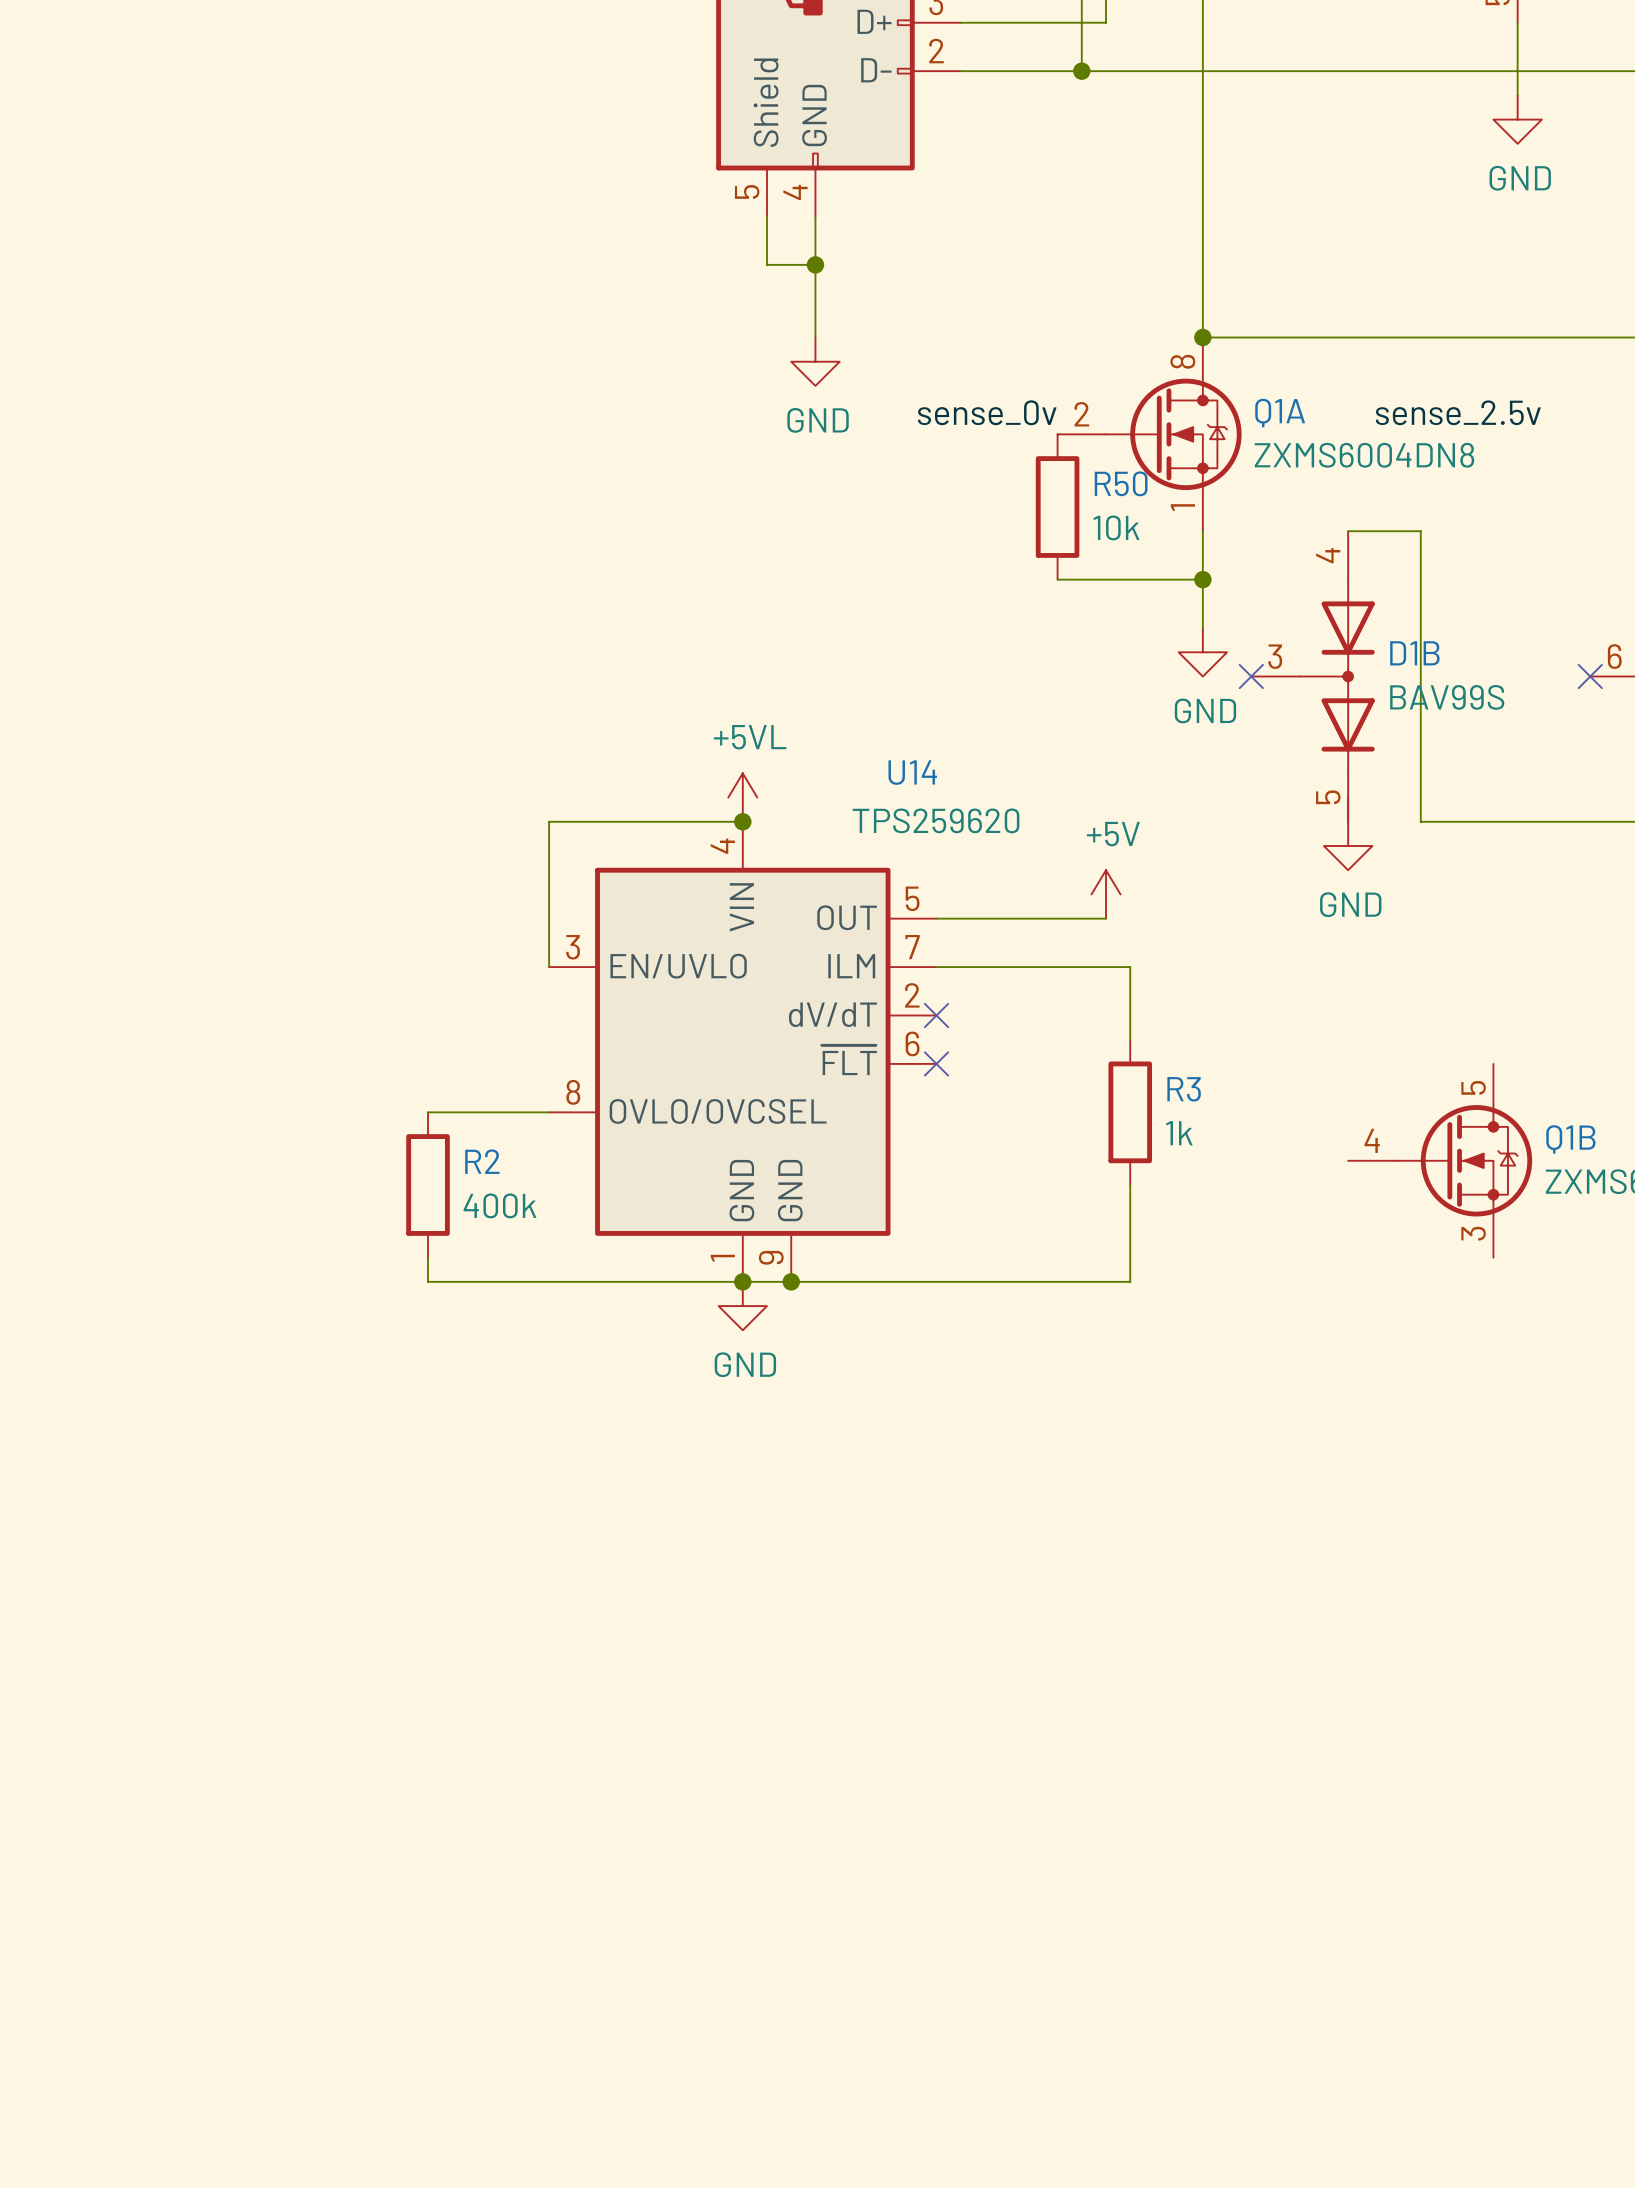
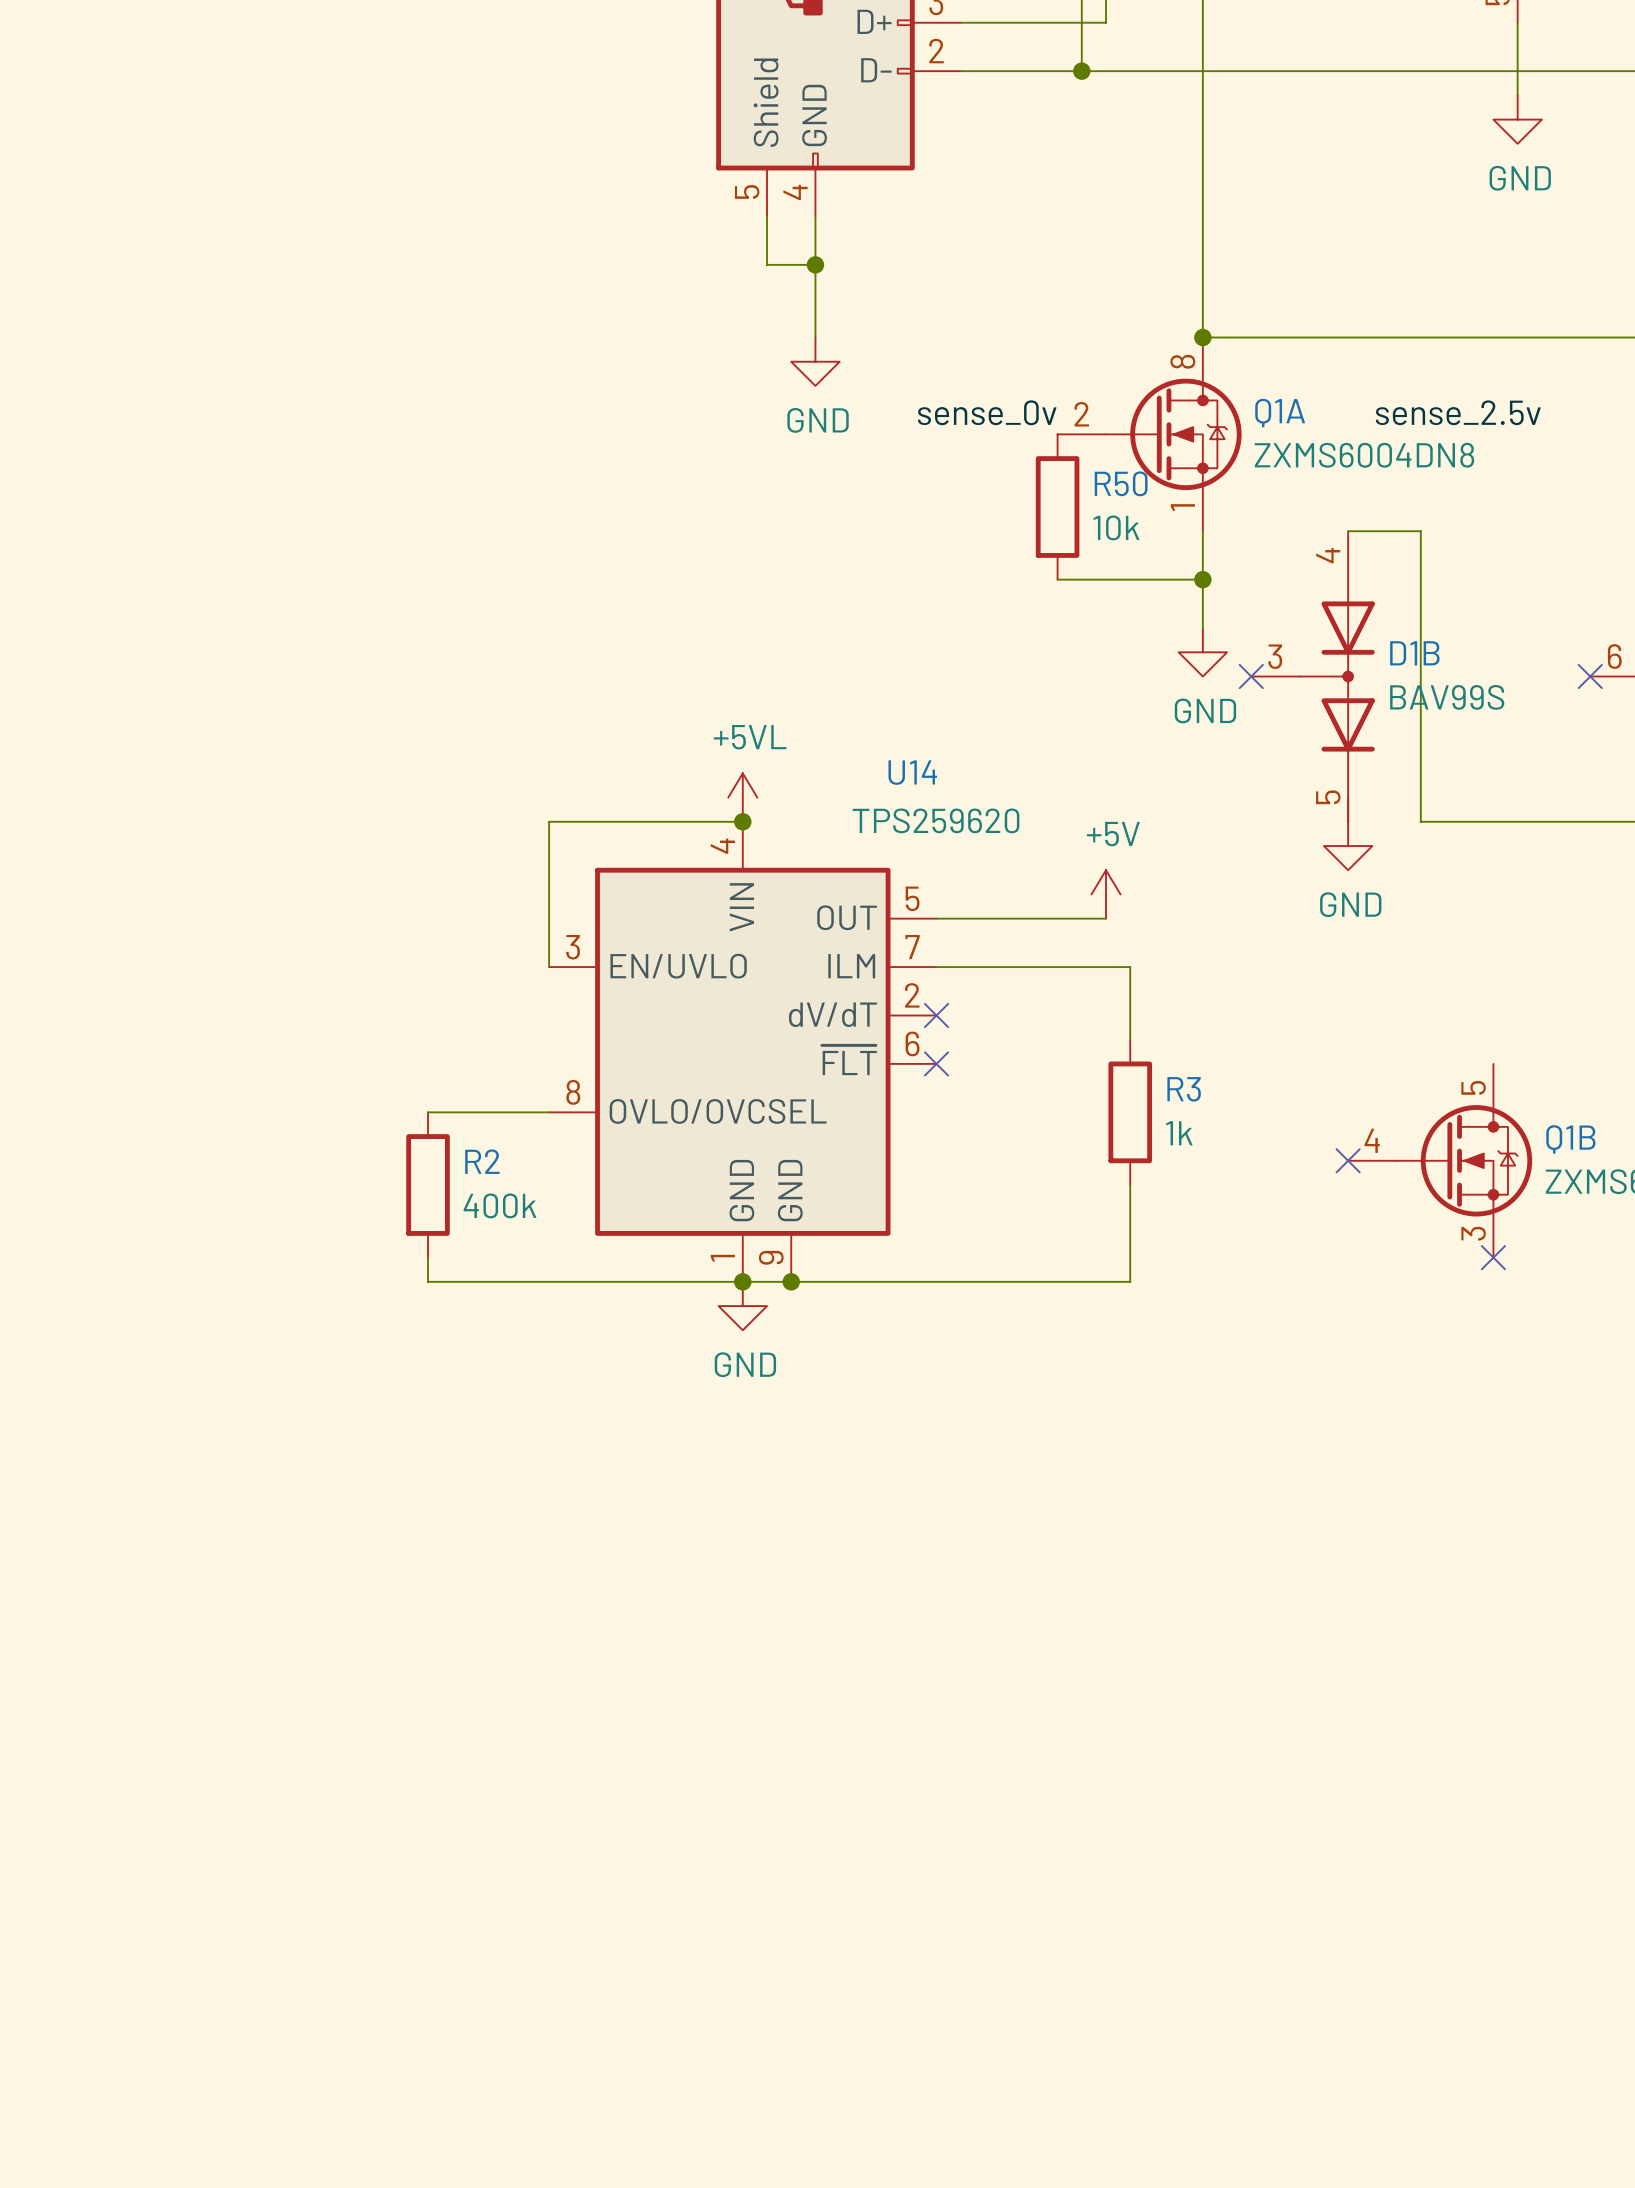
no-connect mark: none -> (1348, 1160)
no-connect mark: none -> (1493, 1257)

